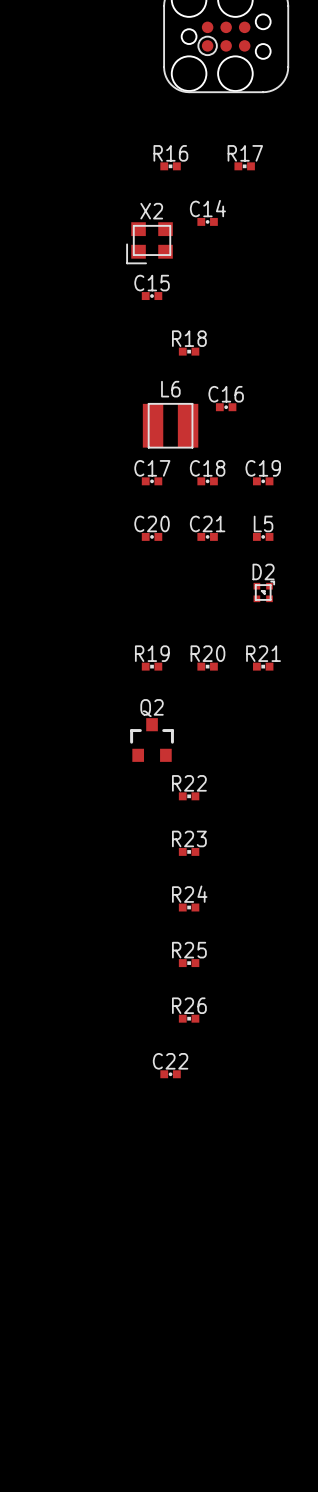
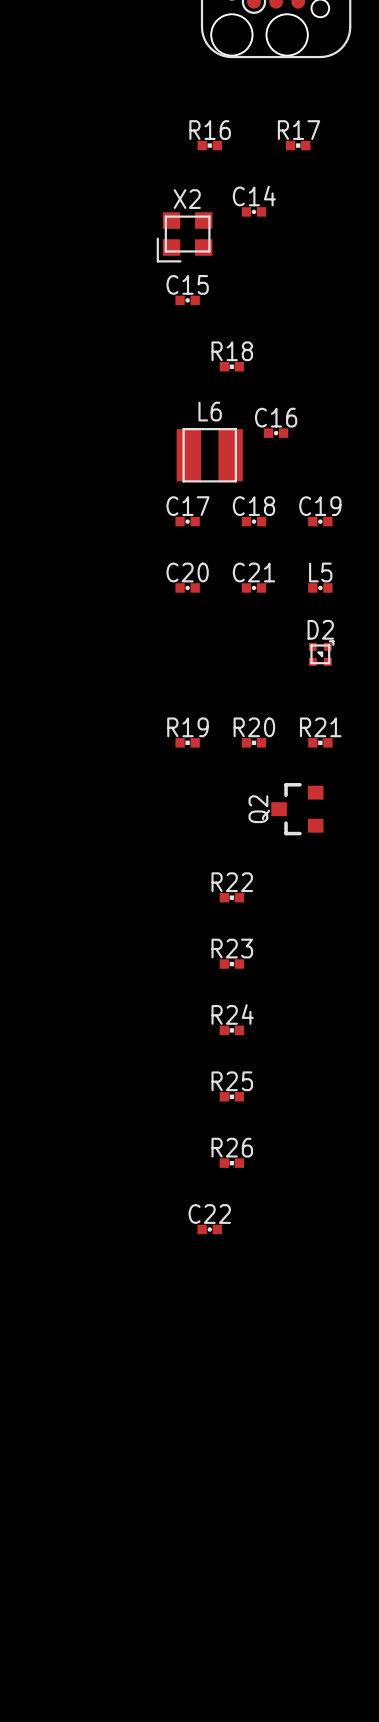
Q2 rotation: 0° (152, 740) -> 90° counterclockwise (297, 809)
Q2 position: (152, 740) -> (297, 809)

